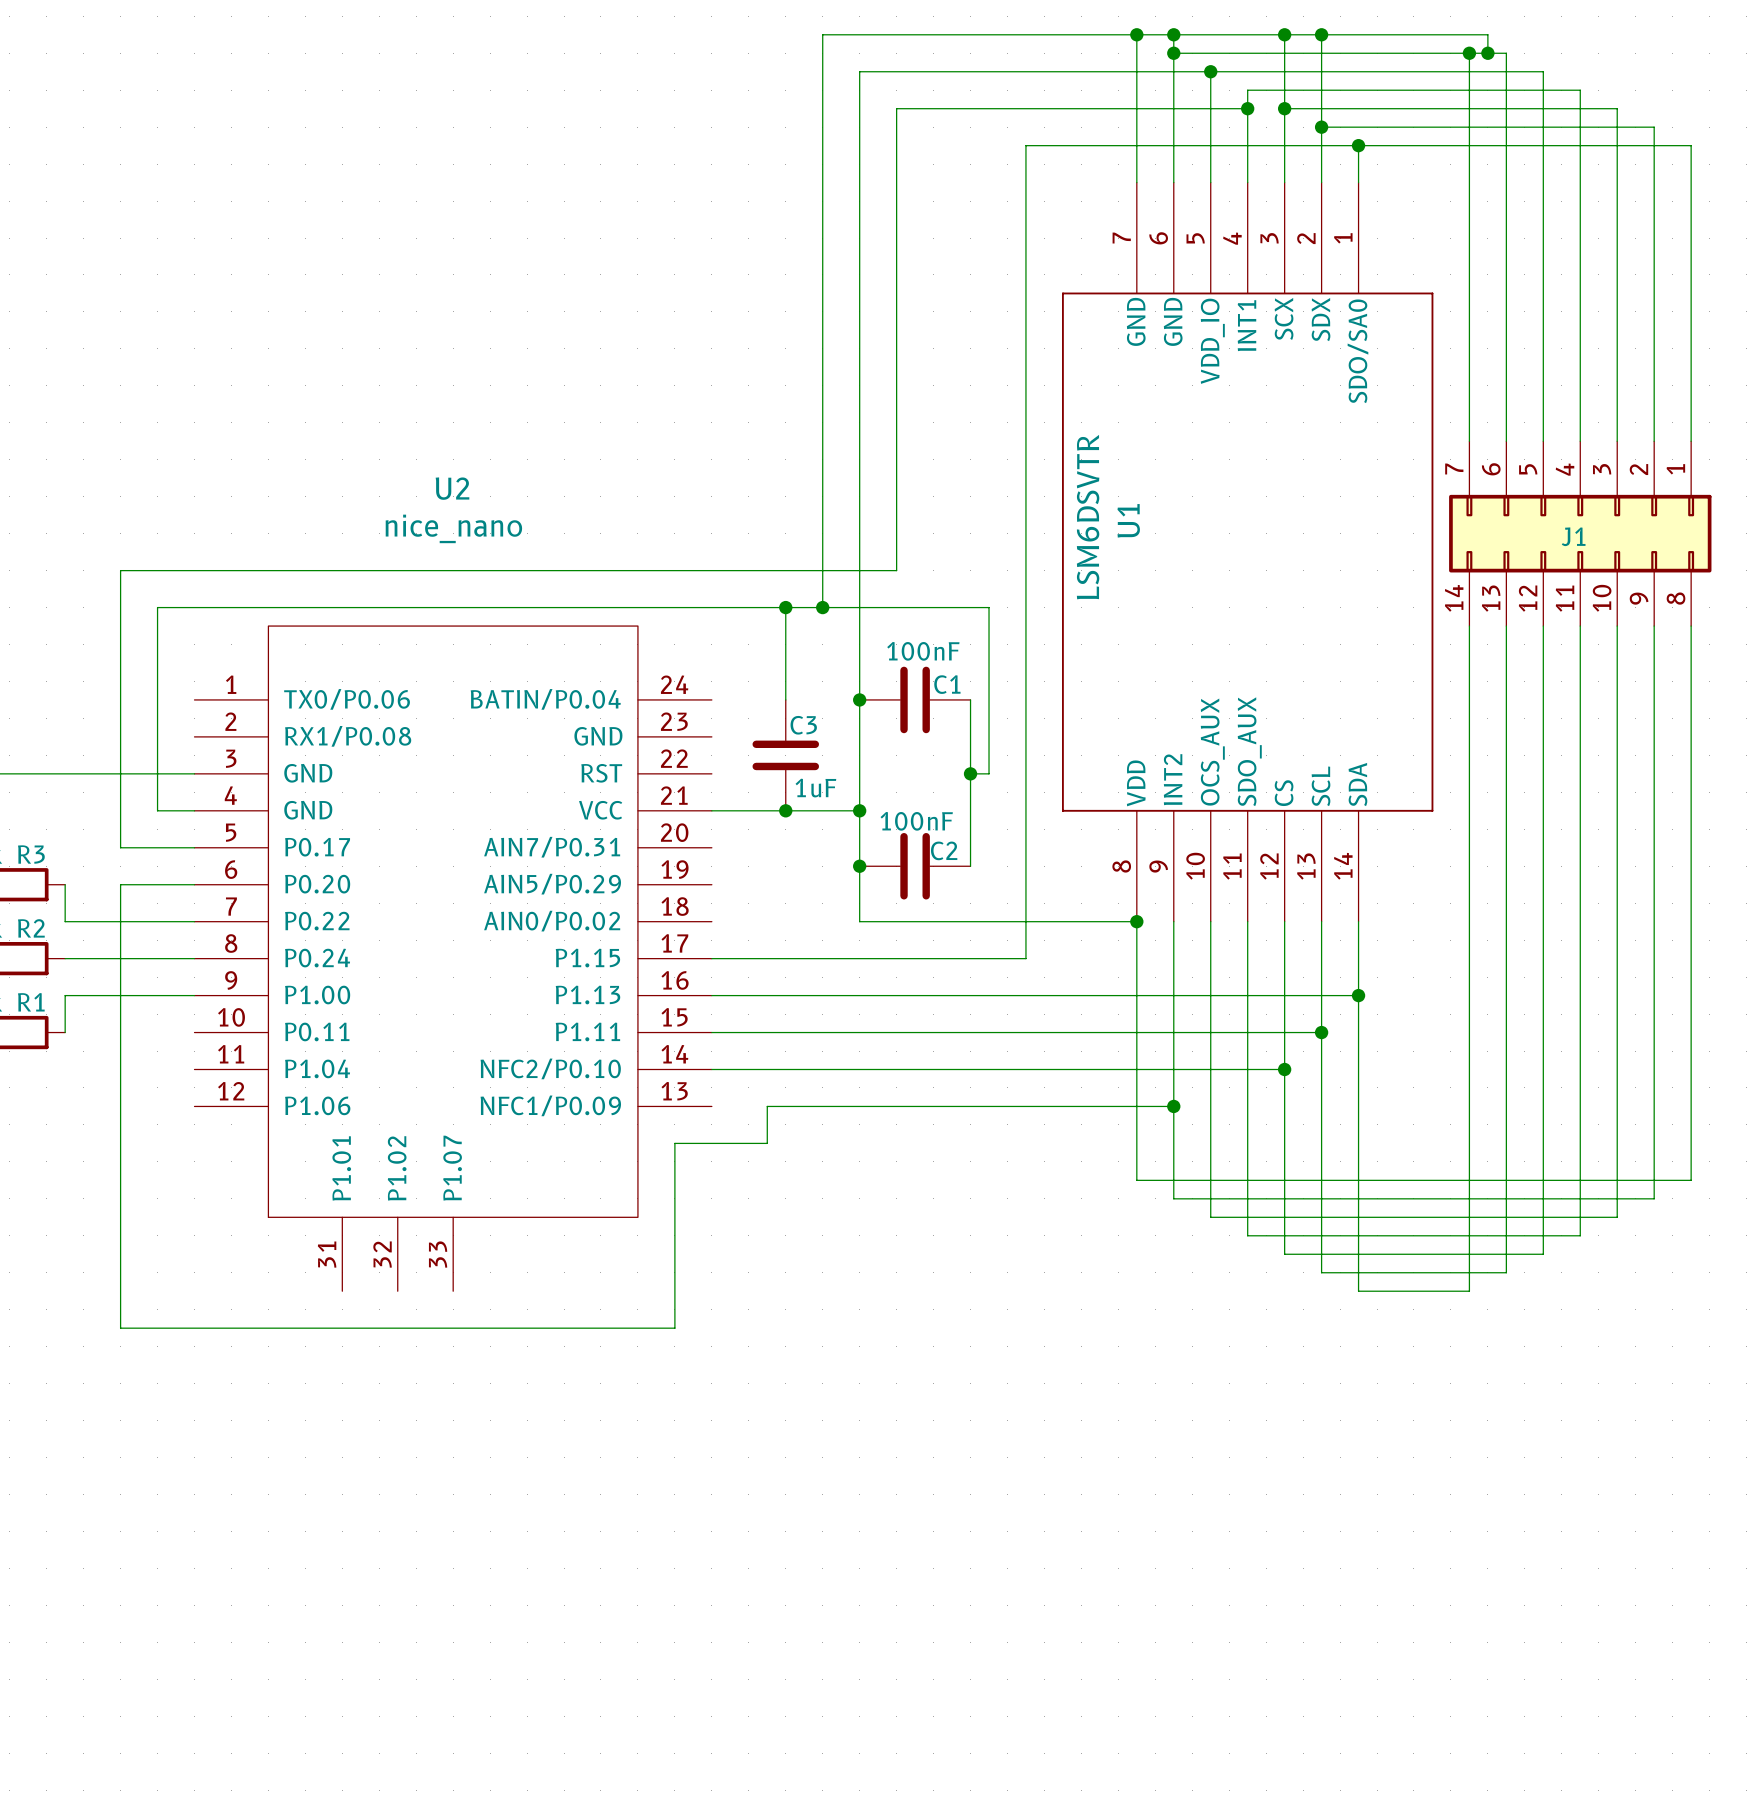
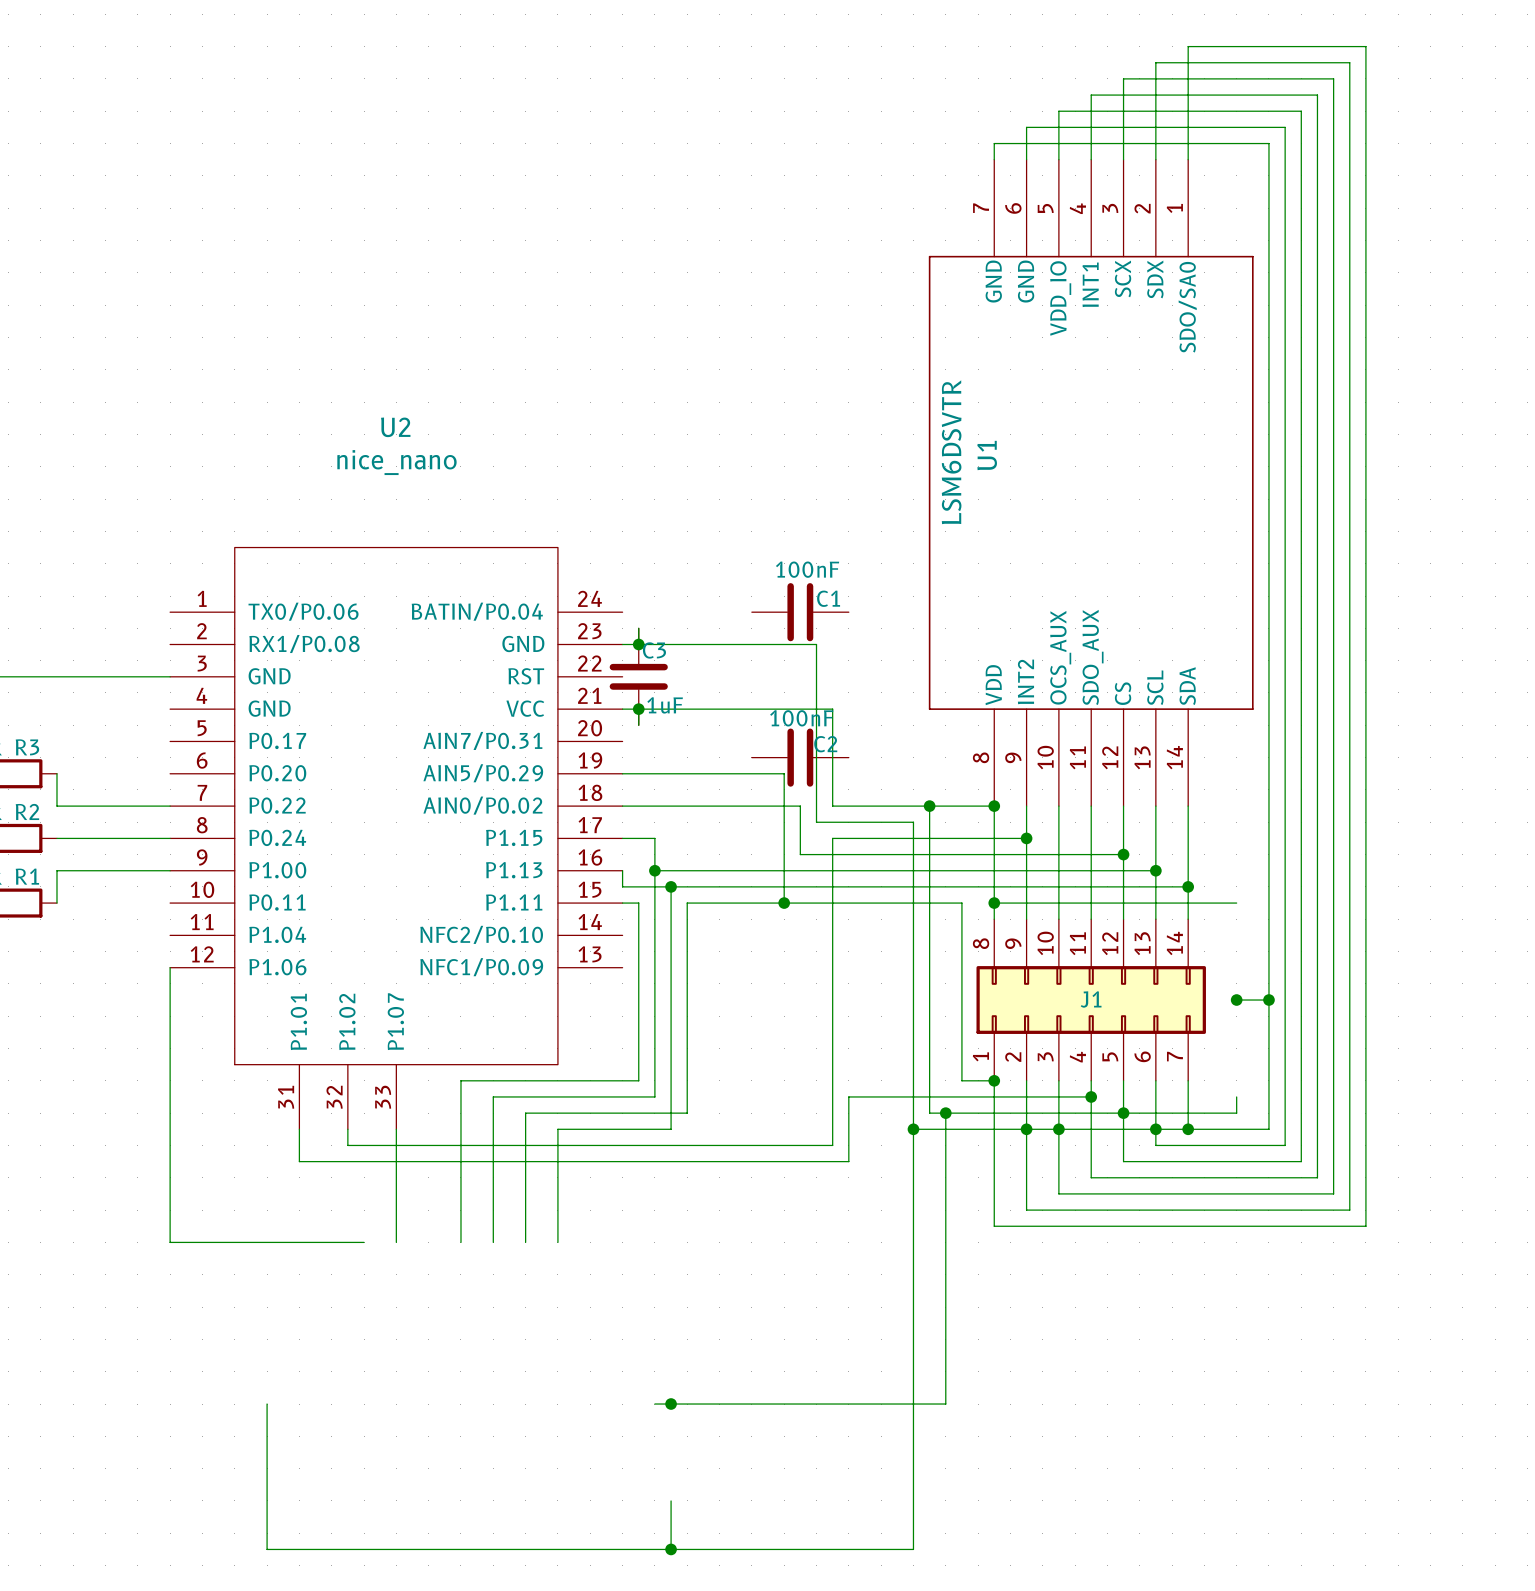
wire: (1136, 34) (1136, 164) -> (1268, 1129) (1268, 143) (994, 143)
junction: (1136, 34) -> none
wire: (1173, 34) (1173, 145) (1025, 145) (1025, 958) -> (1026, 838) (897, 838)
junction: (1173, 34) -> none
wire: (1284, 34) (1284, 90) (1247, 90) (1247, 108) (896, 108) (896, 570) (120, 570) (120, 847) (194, 847) -> none
junction: (1284, 34) -> none
wire: (1321, 34) (1321, 71) (859, 71) (859, 921) -> (622, 806) (751, 806)
junction: (1321, 34) -> none
wire: (1173, 53) (1358, 53) -> (1188, 127) (1188, 46)
junction: (1173, 53) -> none
wire: (1469, 53) (1469, 145) (1691, 145) (1691, 441) -> none
junction: (1469, 53) -> none
wire: (1487, 53) (1487, 34) (822, 34) (822, 607) -> none
junction: (1487, 53) -> none
wire: (1506, 53) (1506, 108) (1617, 108) (1617, 441) -> (1317, 46) (1365, 46) (1365, 1226) (994, 1226) (994, 1080) (961, 1080) (961, 903)
wire: (1210, 71) (1210, 127) -> (1155, 111) (1058, 111)
junction: (1210, 71) -> none
wire: (1524, 90) (1580, 90) (1580, 441) -> (1333, 78) (1333, 1193) (1058, 1193) (1058, 1080)
wire: none -> (1091, 95) (1123, 95)
junction: (1247, 108) -> none
junction: (1284, 108) -> none
junction: (1321, 127) -> none
wire: (1487, 127) (1654, 127) (1654, 441) -> (1301, 111) (1301, 1161) (1123, 1161) (1123, 1096)
junction: (1358, 145) -> none
J1 rotation: 0° (1580, 533) -> 180° (1091, 1000)
J1 position: (1580, 533) -> (1091, 1000)
wire: (785, 607) (785, 699) -> none
junction: (785, 607) -> none
junction: (822, 607) -> none
wire: (1580, 626) (1580, 1235) (1247, 1235) (1247, 1051) -> none
wire: (1617, 626) (1617, 1217) (1210, 1217) (1210, 1051) -> none
wire: (1654, 626) (1654, 1198) (1173, 1198) (1173, 1051) -> none
wire: (1691, 626) (1691, 1180) (1136, 1180) (1136, 1051) -> none
junction: (859, 699) -> none
wire: (970, 699) (970, 866) -> none
wire: none -> (638, 628) (638, 644)
wire: none -> (622, 644) (816, 644) (816, 822) (913, 822) (913, 1549) (267, 1549) (267, 1404)
junction: none -> (638, 644)
C3 position: (785, 755) -> (638, 676)
wire: (970, 773) (989, 773) (989, 607) (157, 607) (157, 810) (194, 810) -> none
junction: (970, 773) -> none
wire: none -> (638, 709) (638, 725)
junction: none -> (638, 709)
junction: (785, 810) -> none
junction: (859, 810) -> none
junction: (859, 866) -> none
wire: (194, 884) (120, 884) (120, 1328) (342, 1328) -> (299, 1129) (299, 1161)
wire: none -> (622, 773) (784, 773) (784, 903)
wire: (915, 921) (952, 921) -> (751, 709) (832, 709) (832, 806)
wire: none -> (800, 806) (800, 854) (1123, 854)
junction: none -> (929, 806)
wire: (748, 958) (952, 958) -> (347, 1129) (347, 1145) (832, 1145) (832, 838)
wire: none -> (654, 838) (654, 1096) (493, 1096) (493, 1242)
junction: none -> (1026, 838)
junction: none -> (1123, 854)
wire: (711, 995) (748, 995) -> (622, 870) (622, 886) (1188, 886)
junction: none -> (654, 870)
wire: (1321, 995) (1358, 995) -> (1236, 1000) (1268, 1000)
junction: none -> (1155, 870)
junction: (1358, 995) -> none
junction: none -> (671, 886)
junction: none -> (1188, 886)
wire: (730, 1032) (785, 1032) -> (525, 1242) (525, 1113) (687, 1113) (687, 903)
wire: none -> (638, 903) (638, 1080) (460, 1080) (460, 1242)
junction: none -> (784, 903)
wire: (1099, 1032) (1136, 1032) -> none
junction: none -> (994, 903)
wire: none -> (1155, 903) (1236, 903)
junction: (1321, 1032) -> none
wire: (711, 1069) (1284, 1069) -> none
junction: (1284, 1069) -> none
wire: none -> (170, 967) (170, 1242) (364, 1242)
wire: (767, 1106) (1173, 1106) -> (671, 967) (671, 886)
junction: (1173, 1106) -> none
wire: (767, 1143) (674, 1143) (674, 1328) -> (671, 1000) (671, 1129) (557, 1129) (557, 1242)
junction: none -> (1236, 1000)
junction: none -> (1268, 1000)
junction: none -> (994, 1080)
wire: none -> (1091, 1080) (1091, 1177) (1317, 1177) (1317, 1113)
wire: none -> (1091, 1096) (848, 1096) (848, 1161) (590, 1161)
junction: none -> (1091, 1096)
wire: (1284, 1254) (1543, 1254) -> (1026, 1080) (1026, 1210) (1349, 1210) (1349, 1096)
wire: none -> (945, 1113) (945, 1404) (654, 1404)
junction: none -> (945, 1113)
junction: none -> (1123, 1113)
wire: (1413, 1272) (1506, 1272) -> (1236, 1113) (1236, 1096)
wire: none -> (396, 1129) (396, 1242)
wire: none -> (913, 1129) (1188, 1129)
junction: none -> (913, 1129)
junction: none -> (1026, 1129)
junction: none -> (1058, 1129)
junction: none -> (1155, 1129)
junction: none -> (1188, 1129)
wire: (1450, 1291) (1469, 1291) -> (929, 806) (929, 1113) (1155, 1113) (1155, 1145) (1285, 1145) (1285, 1129)
junction: none -> (671, 1404)
wire: none -> (671, 1500) (671, 1549)
junction: none -> (671, 1549)

